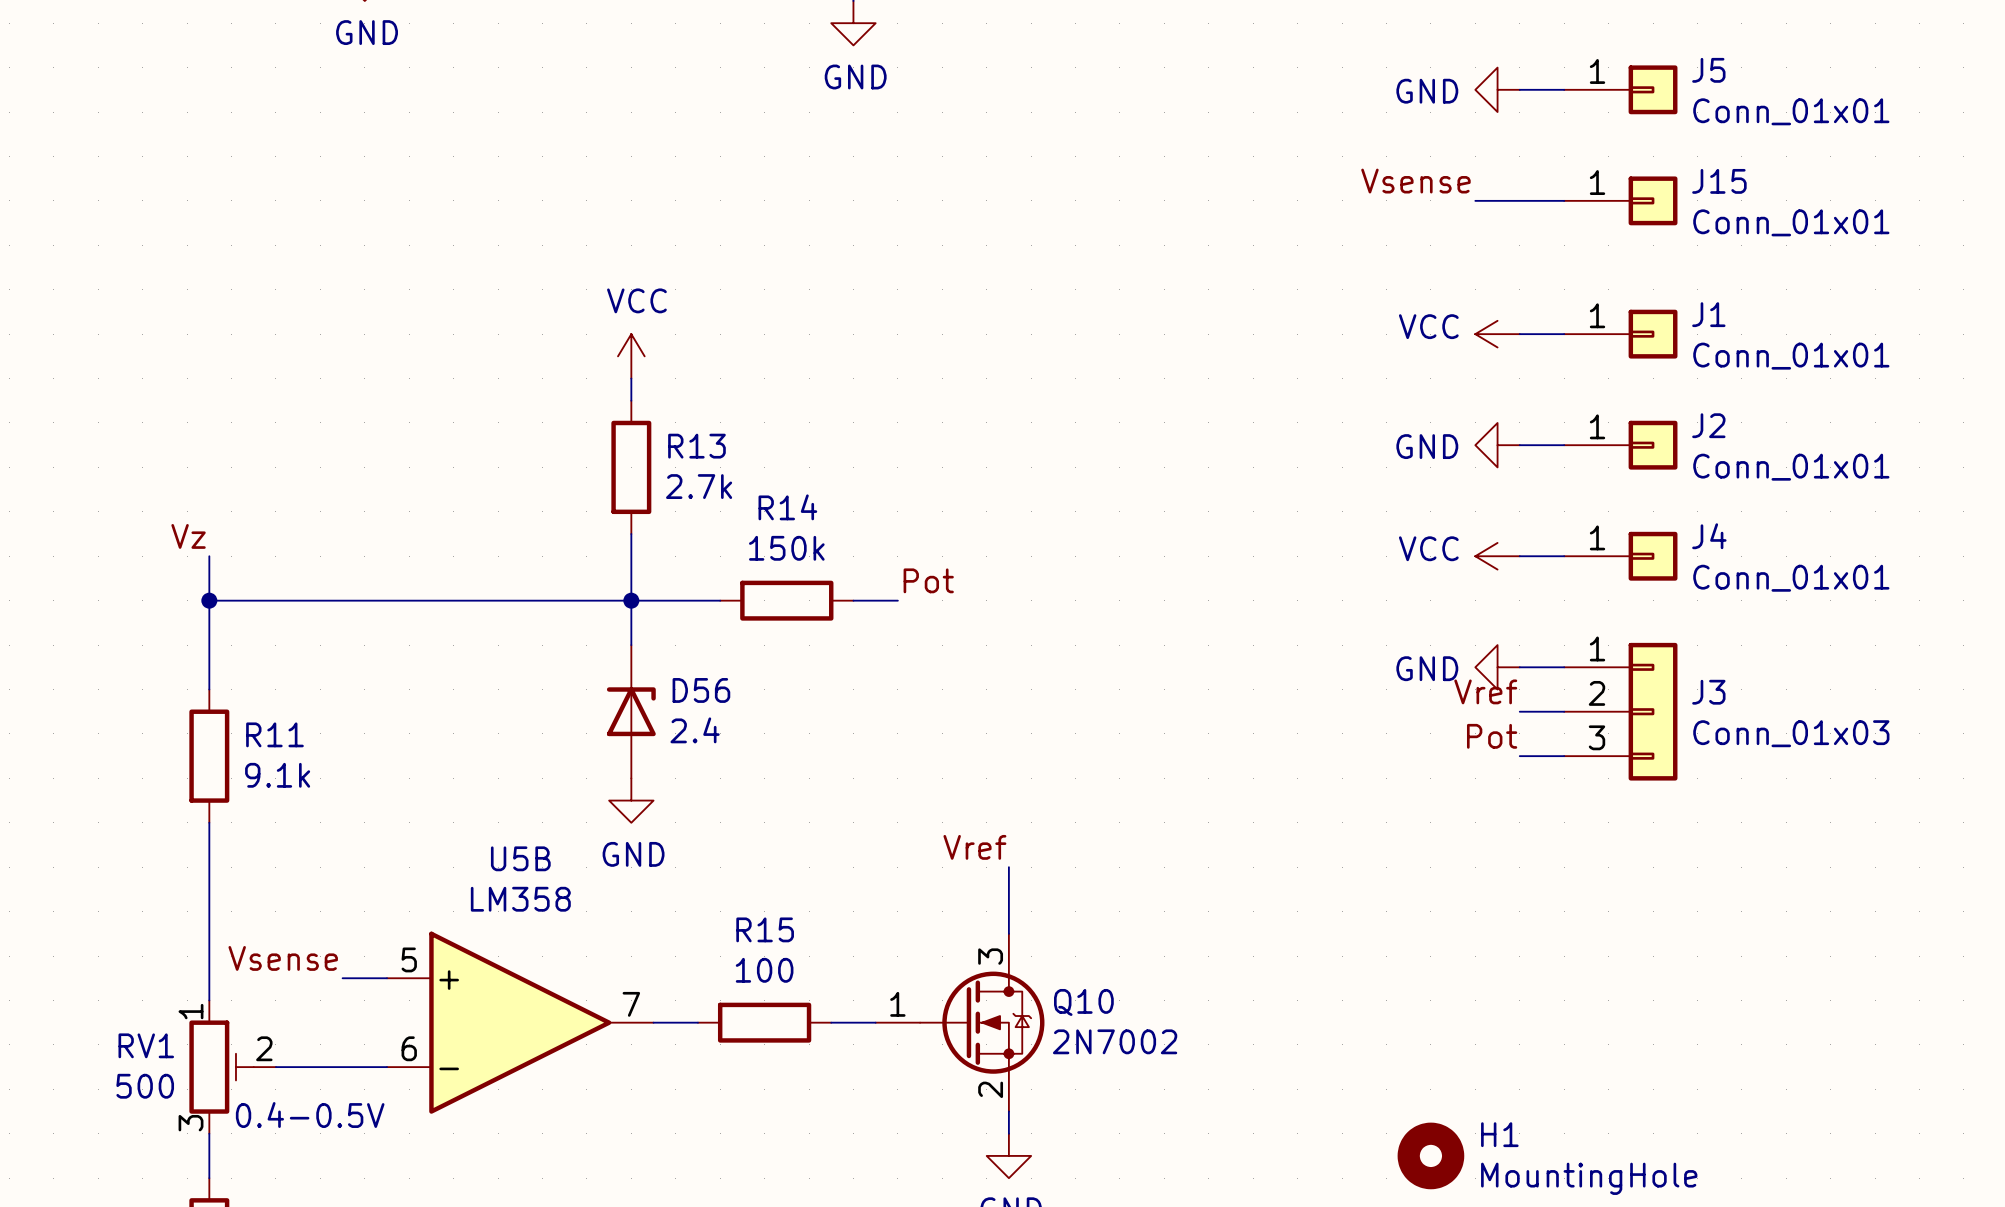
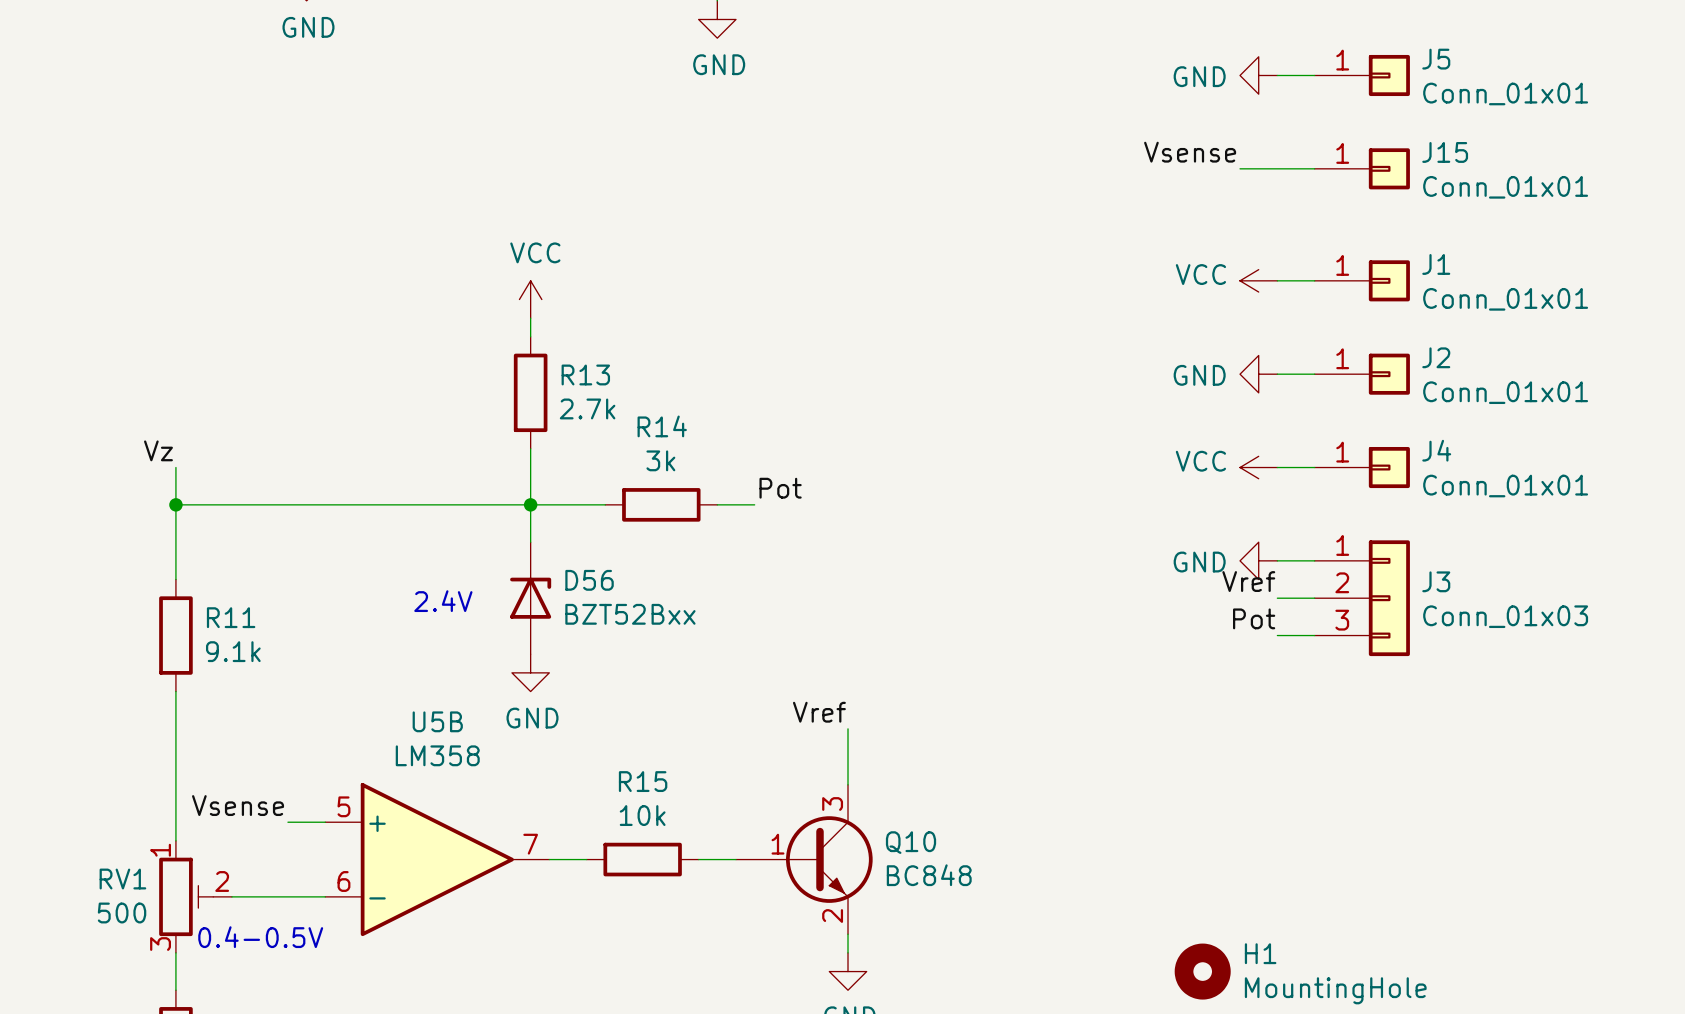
R14 value: 150k (786, 548) -> 3k (660, 460)
text: none -> 2.4V (443, 601)
D56 value: 2.4 (695, 730) -> BZT52Bxx (630, 614)
Q10 symbol: [875, 933, 1045, 1112] -> [735, 784, 873, 935]
R15 value: 100 (764, 970) -> 10k (642, 815)
Q10 value: 2N7002 (1115, 1041) -> BC848 (929, 875)

